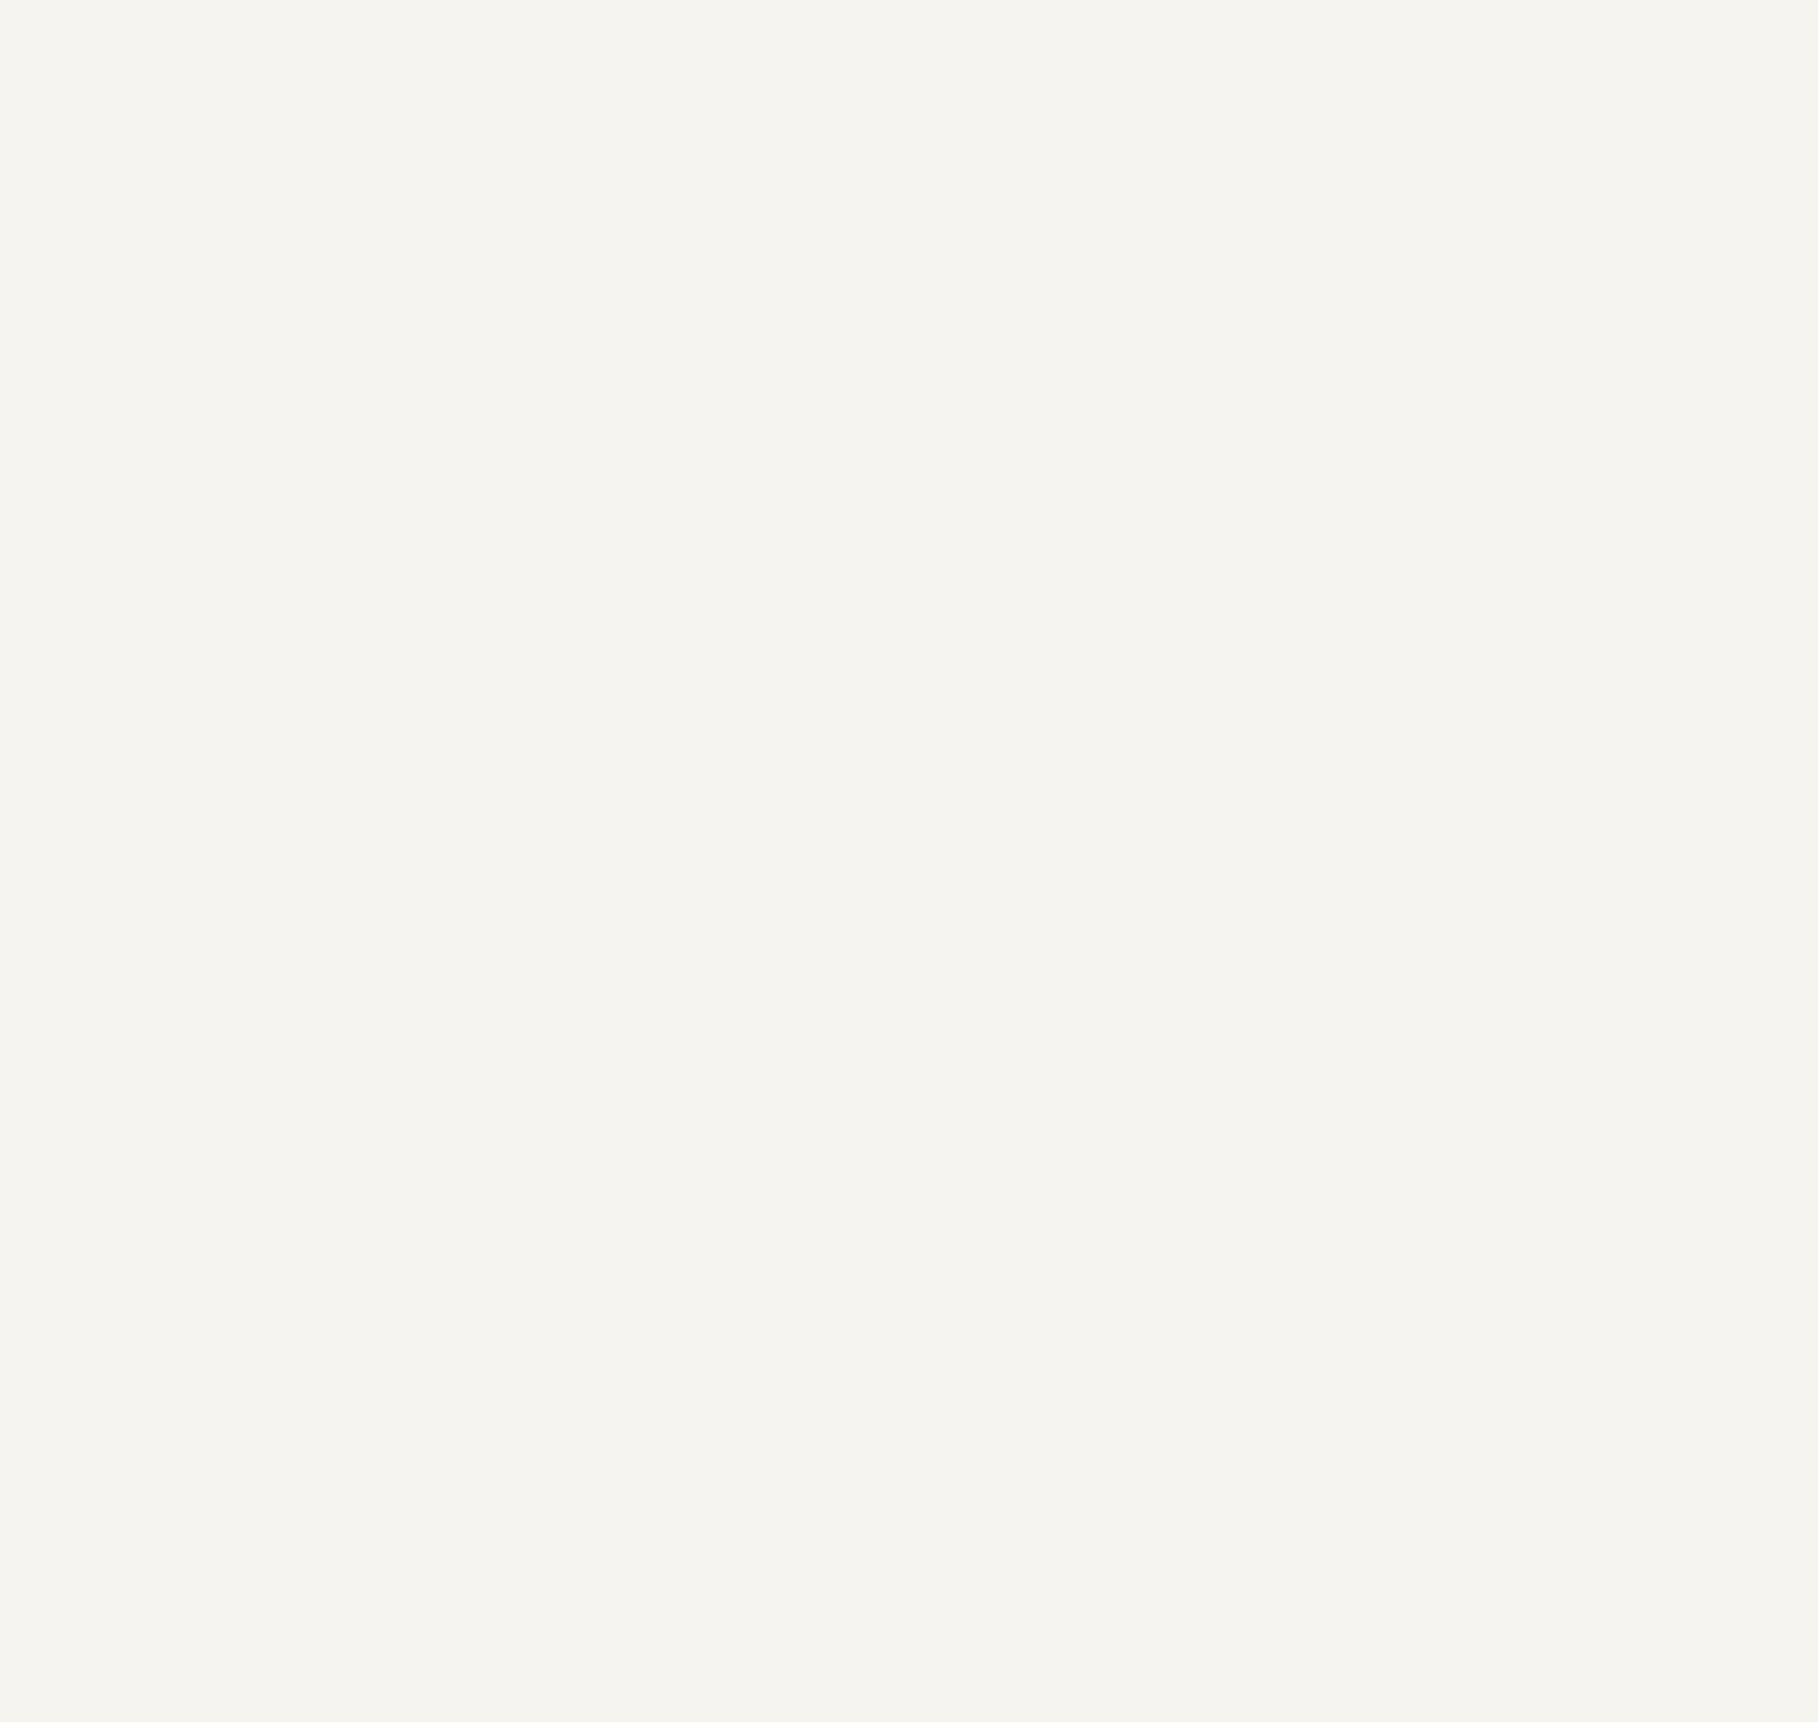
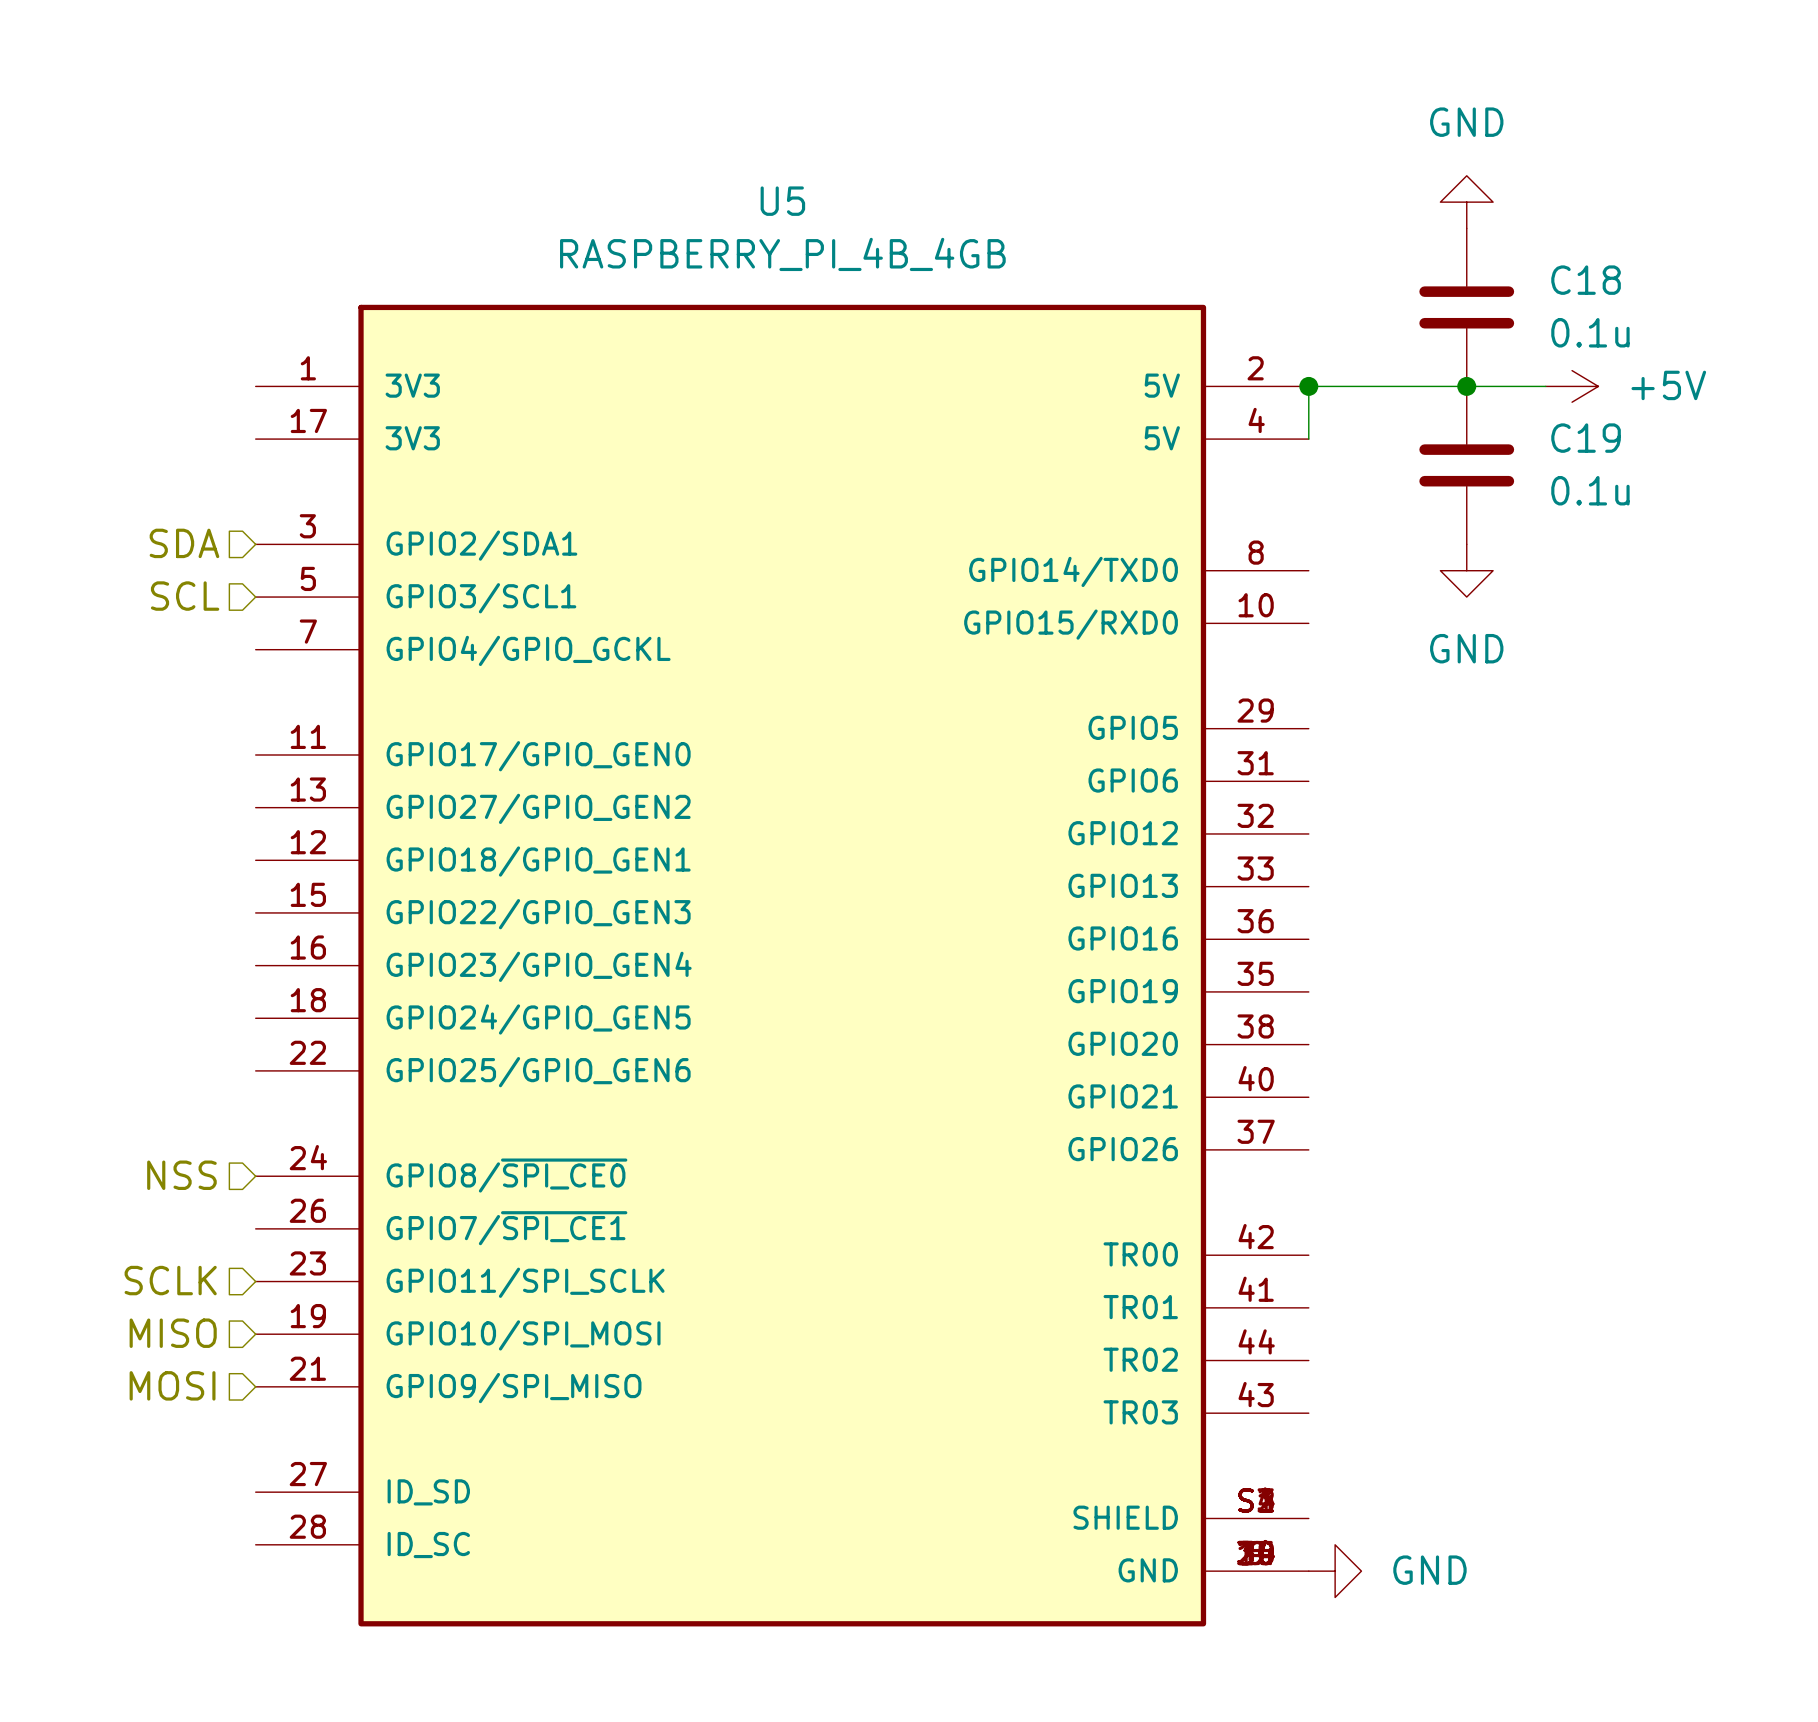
power symbol: none -> GND (1466, 202)
C18: none -> 0.1u (1466, 307)
junction: none -> (1308, 386)
junction: none -> (1466, 386)
wire: none -> (1545, 386) (1308, 386) (1308, 439)
power symbol: none -> +5V (1572, 386)
C19: none -> 0.1u (1466, 465)
hierarchical label: none -> SDA (184, 543)
power symbol: none -> GND (1466, 570)
hierarchical label: none -> SCL (185, 596)
U5: none -> RASPBERRY_PI_4B_4GB (782, 965)
hierarchical label: none -> NSS (181, 1175)
hierarchical label: none -> SCLK (170, 1280)
hierarchical label: none -> MISO (173, 1333)
hierarchical label: none -> MOSI (172, 1385)
power symbol: none -> GND (1335, 1571)

